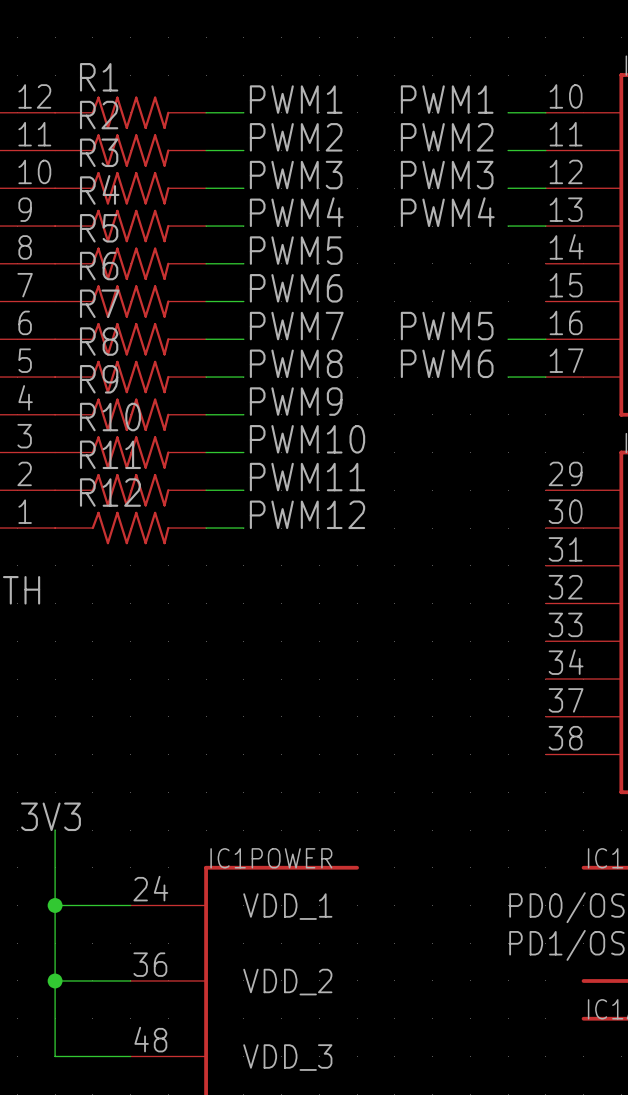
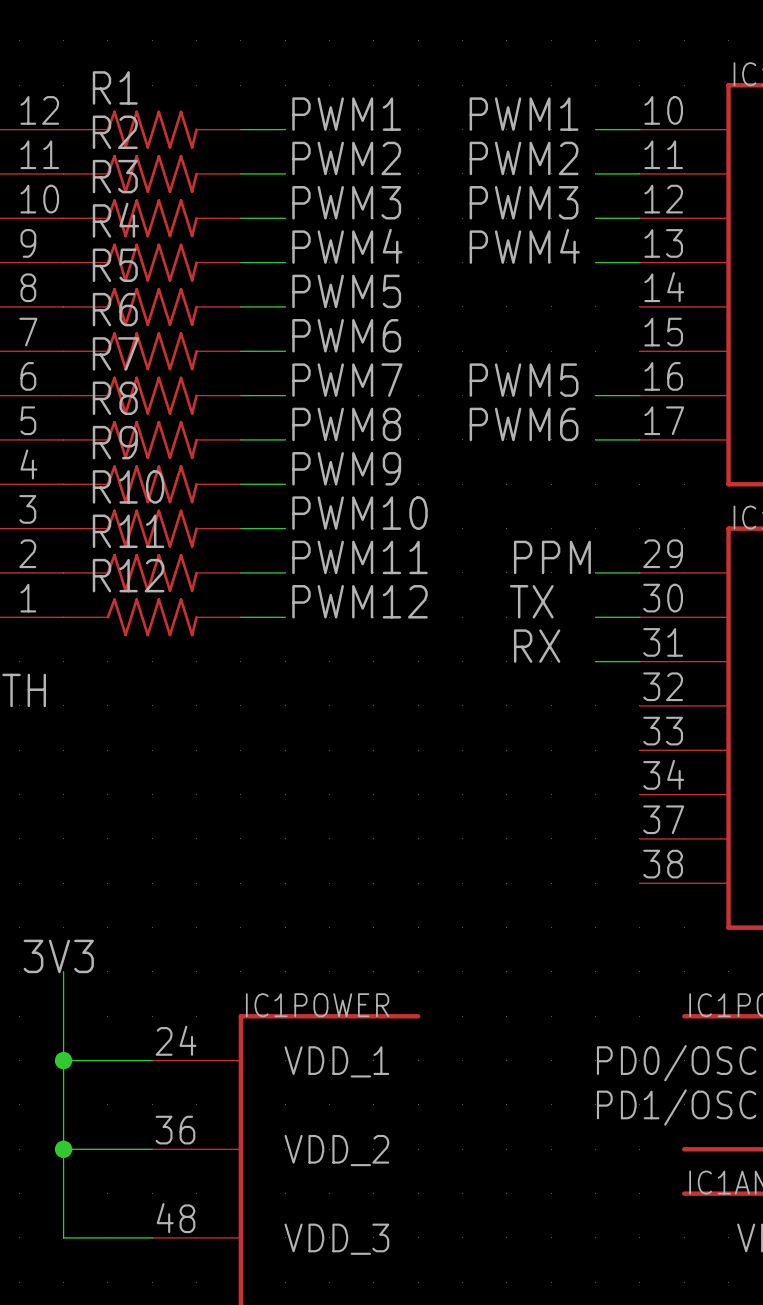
label: none -> PPM (552, 557)
wire: none -> (595, 572) (639, 572)
label: none -> TX (531, 601)
wire: none -> (595, 617) (639, 617)
label: none -> RX (537, 646)
wire: none -> (595, 661) (639, 661)

